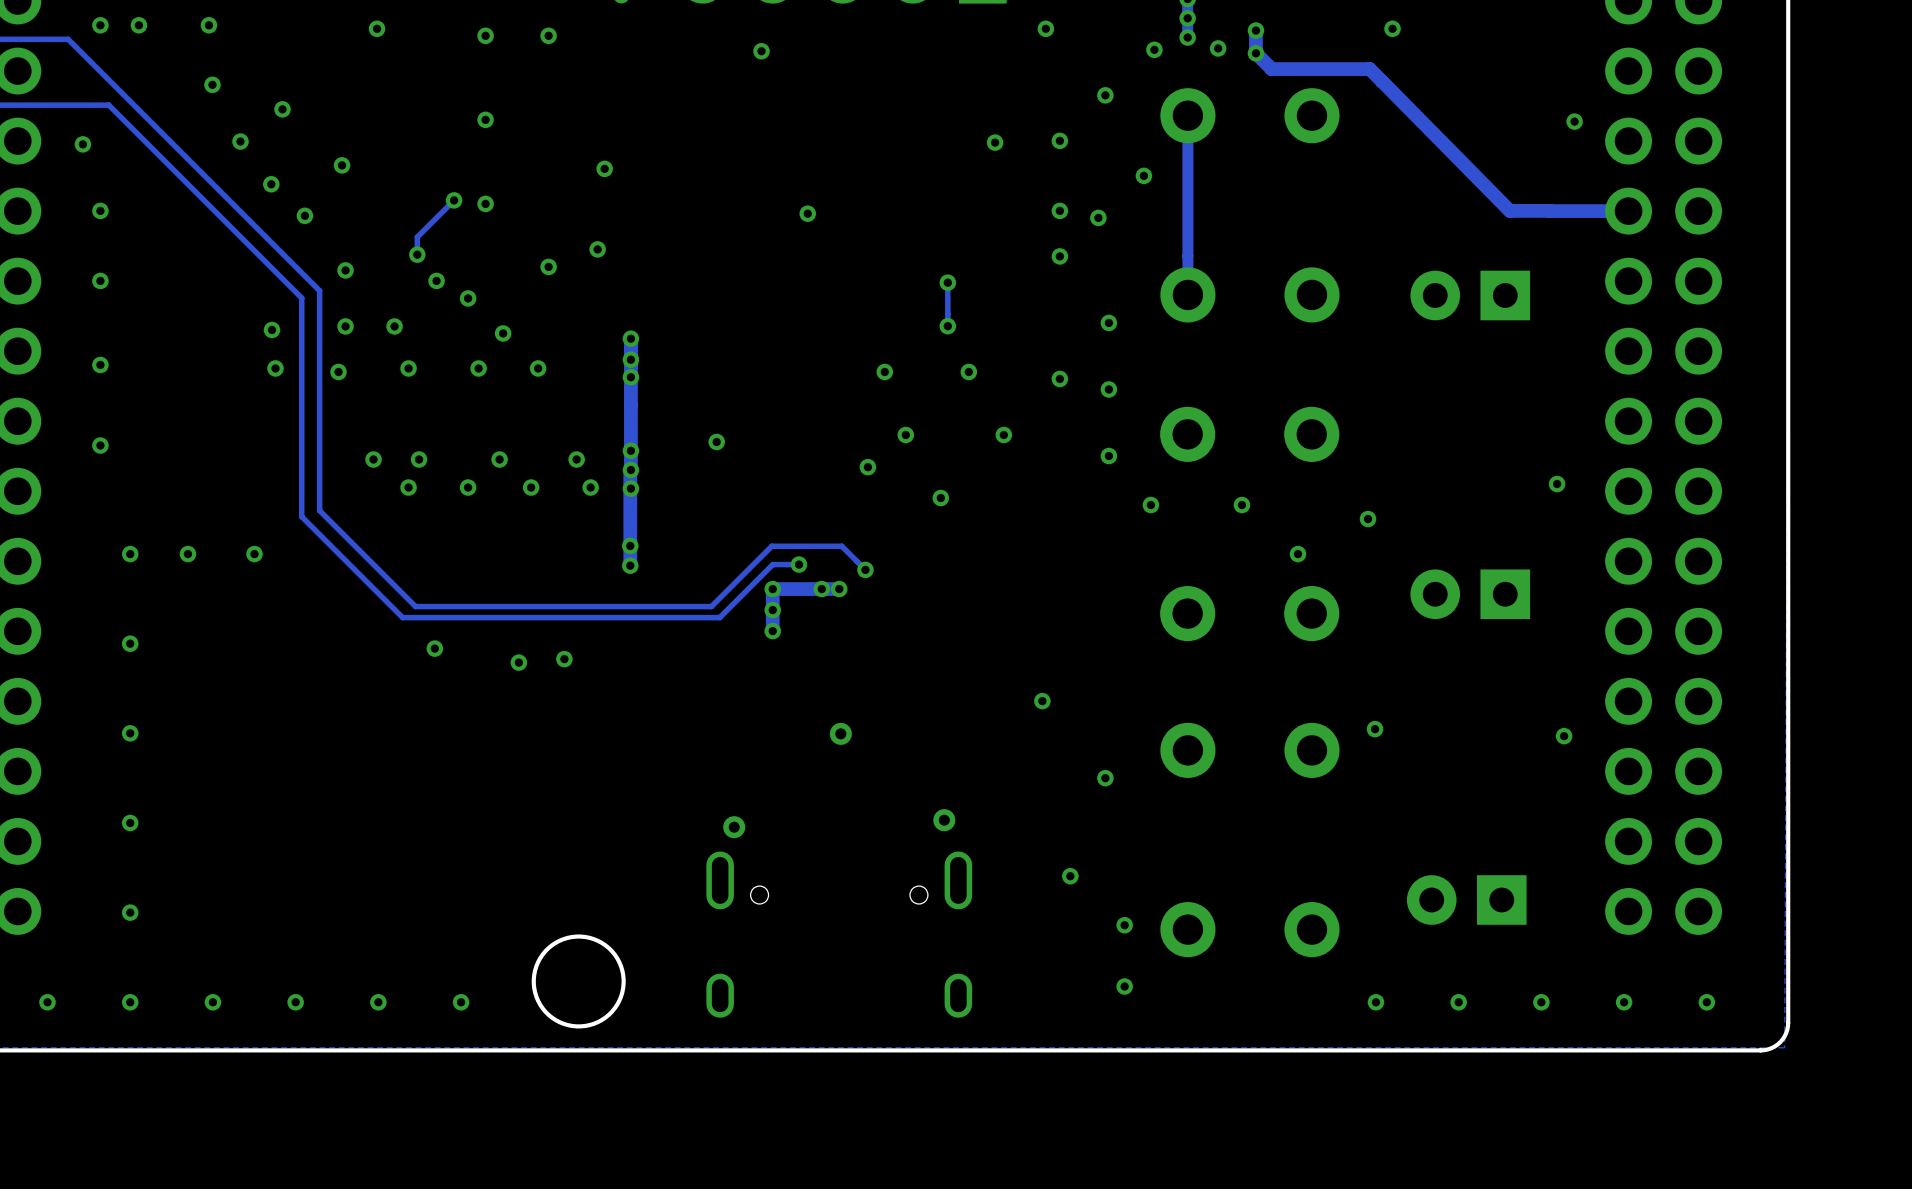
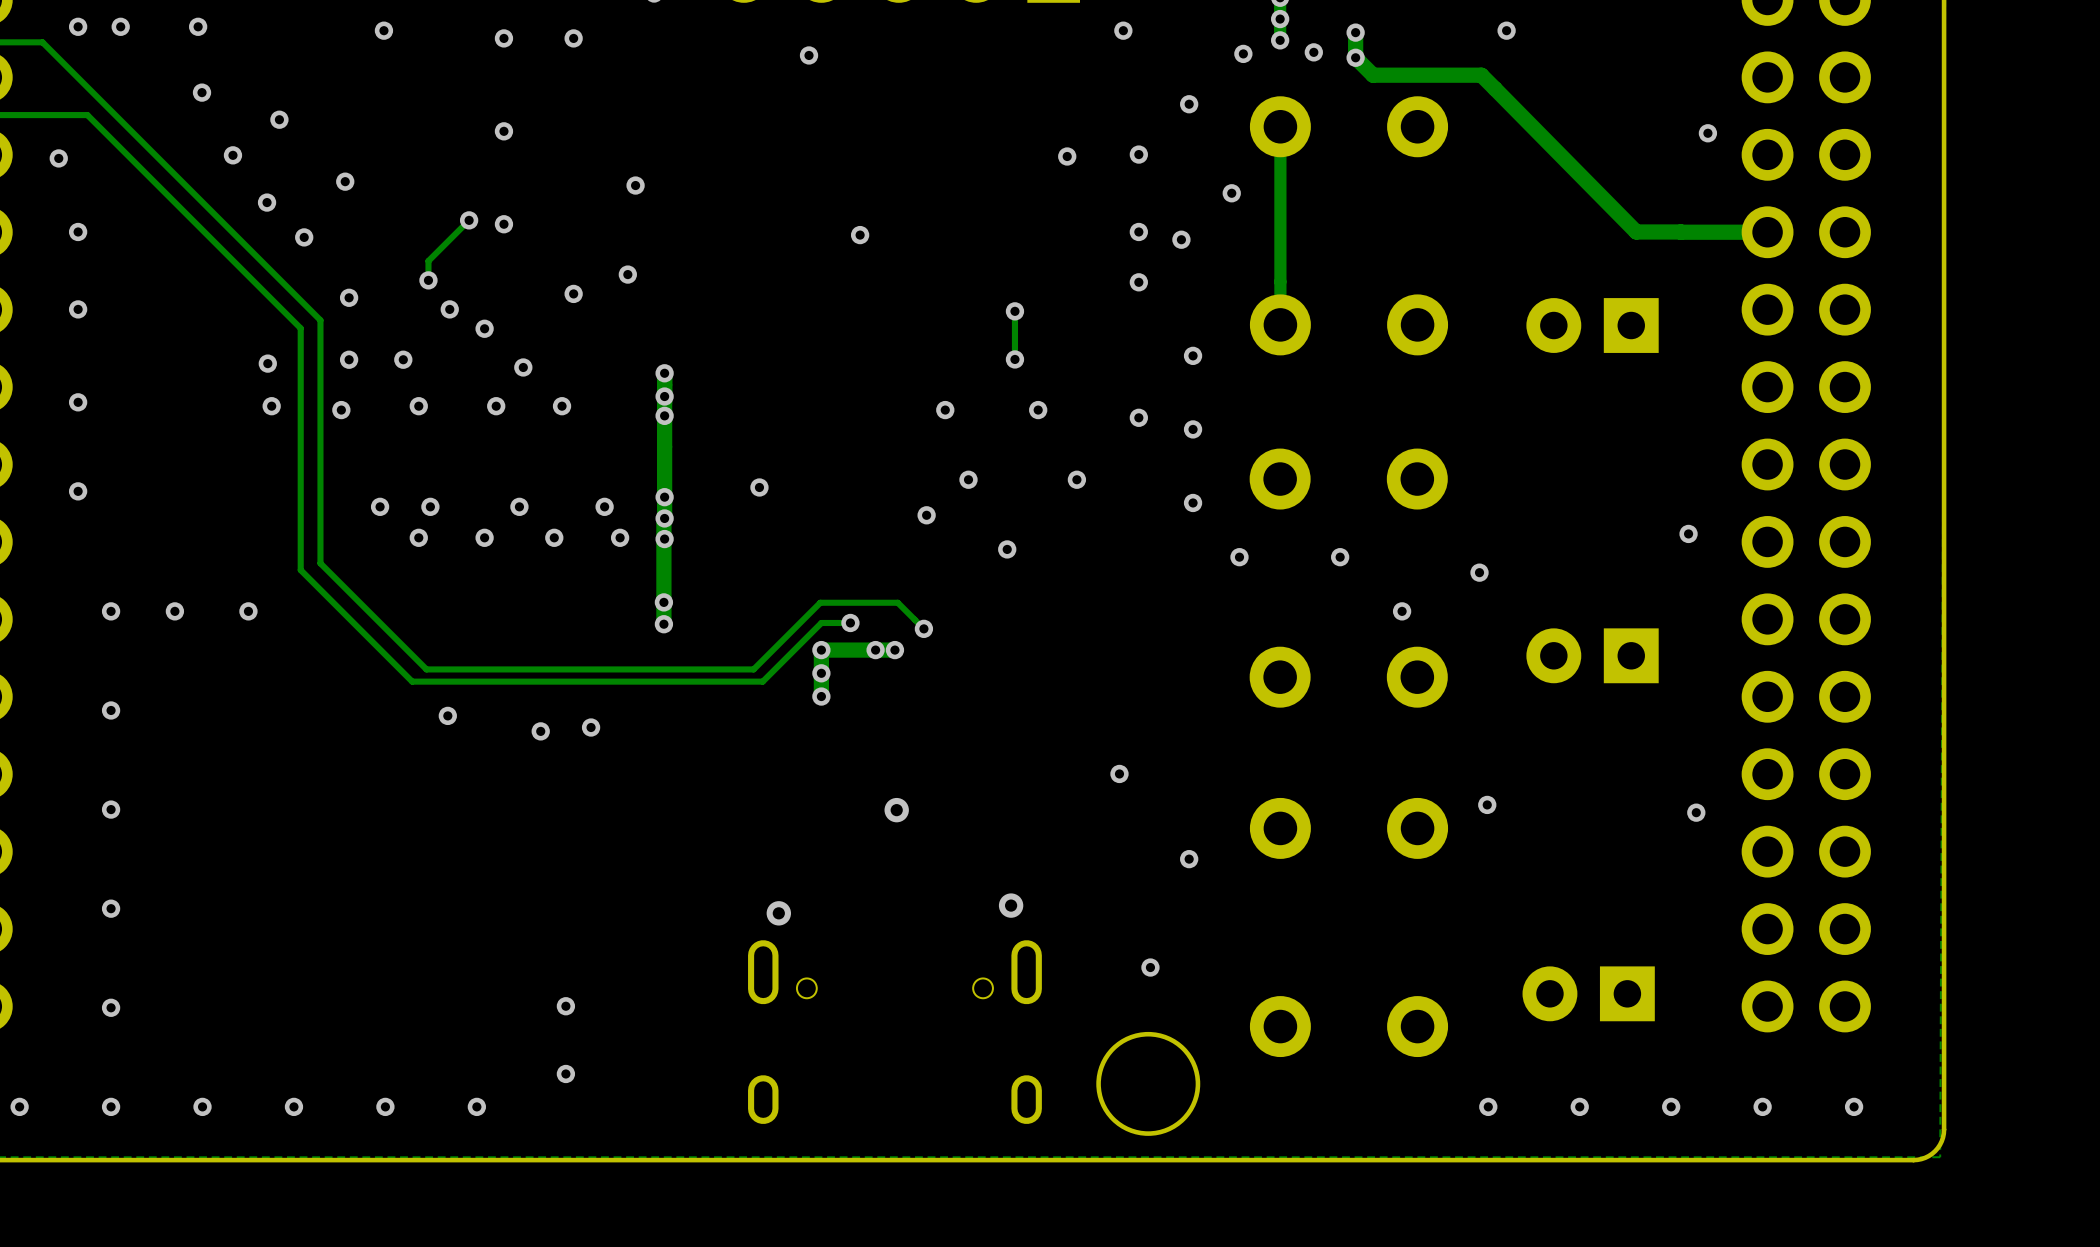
via: none -> (565, 1006)
via: (1124, 925) -> none
via: none -> (565, 1073)
round board edge position: (578, 981) -> (1148, 1083)
via: (1124, 986) -> none

